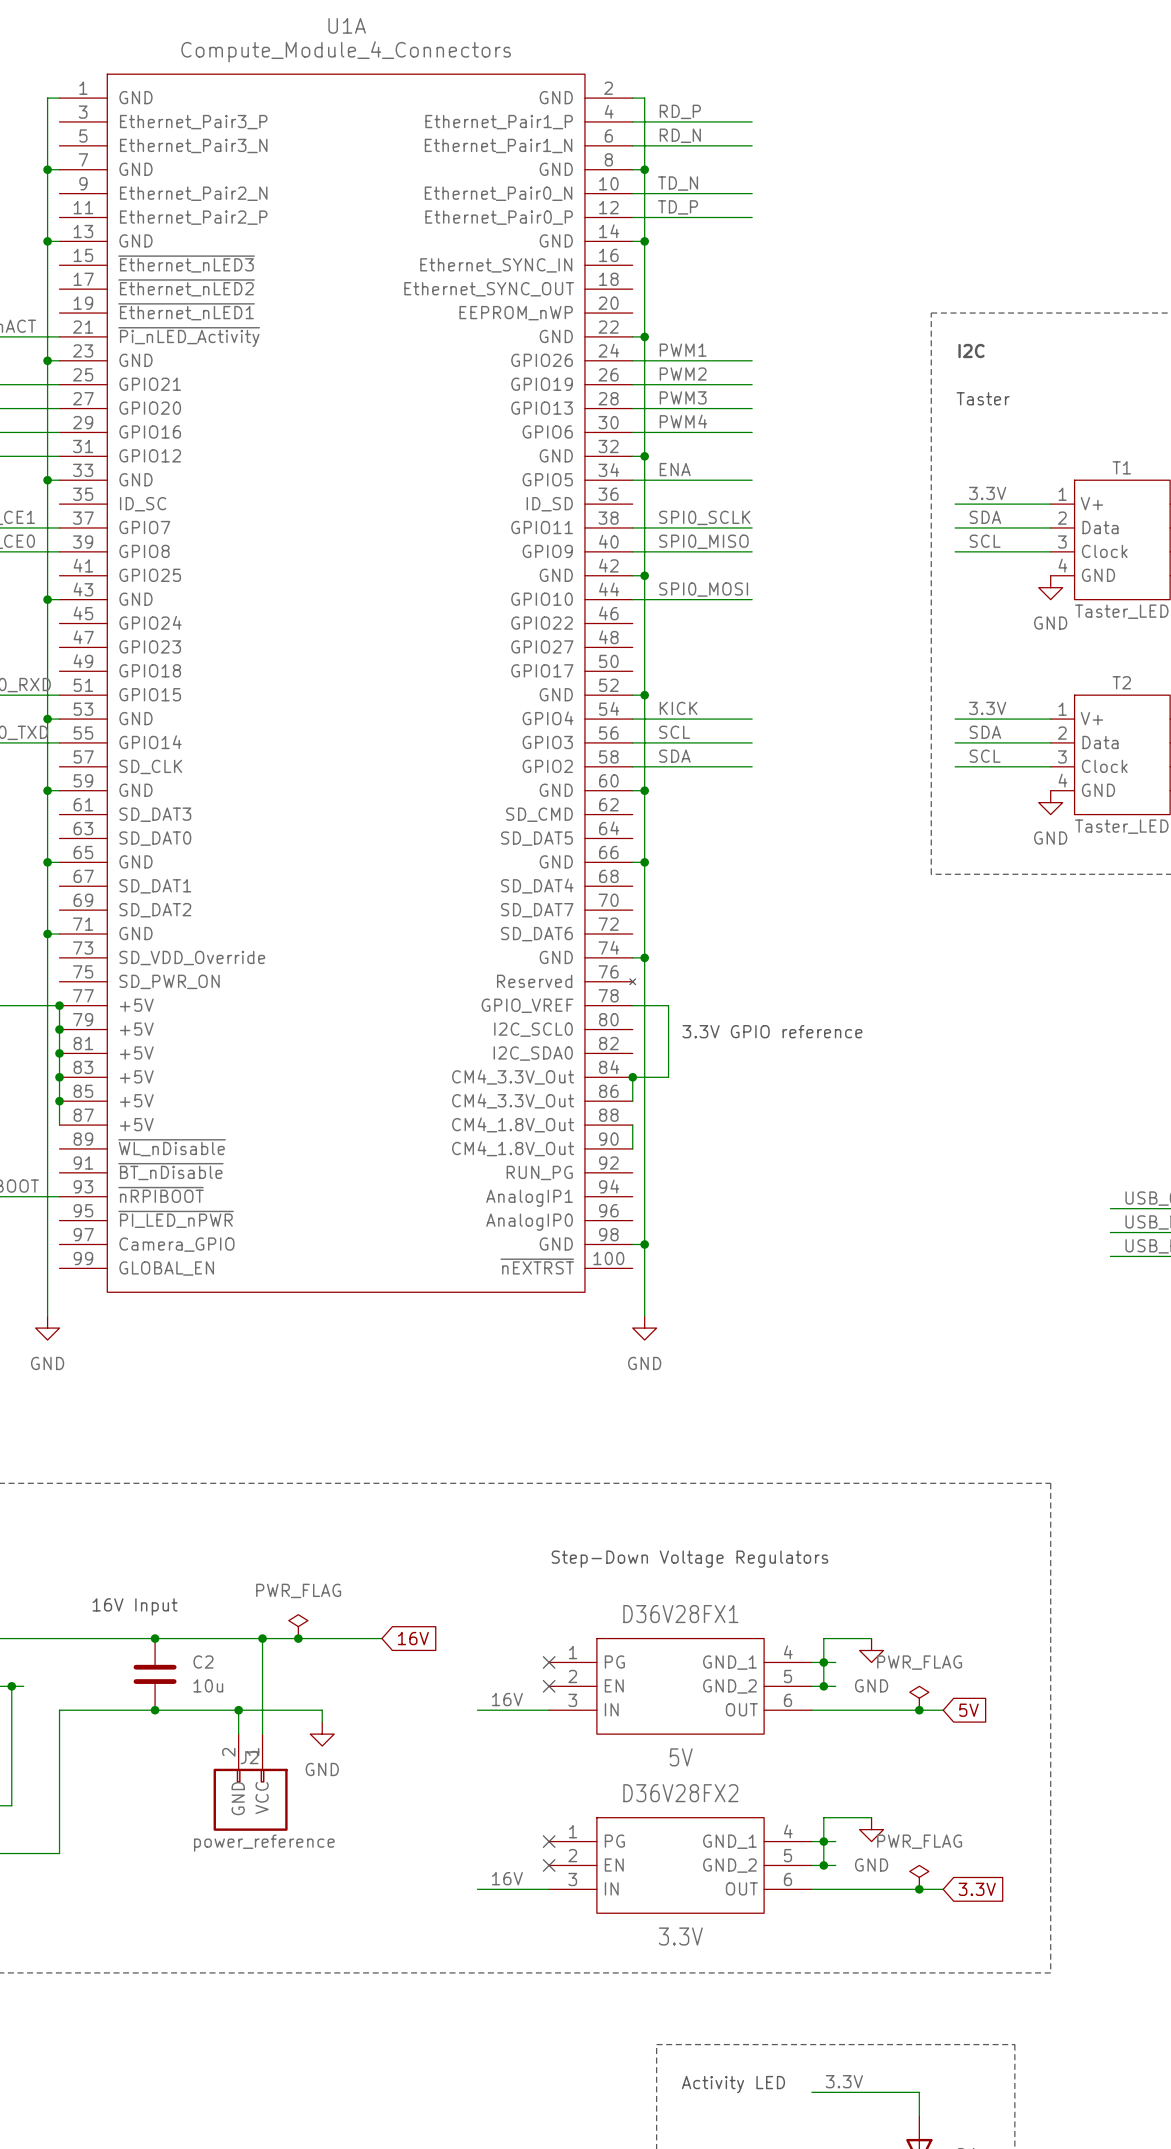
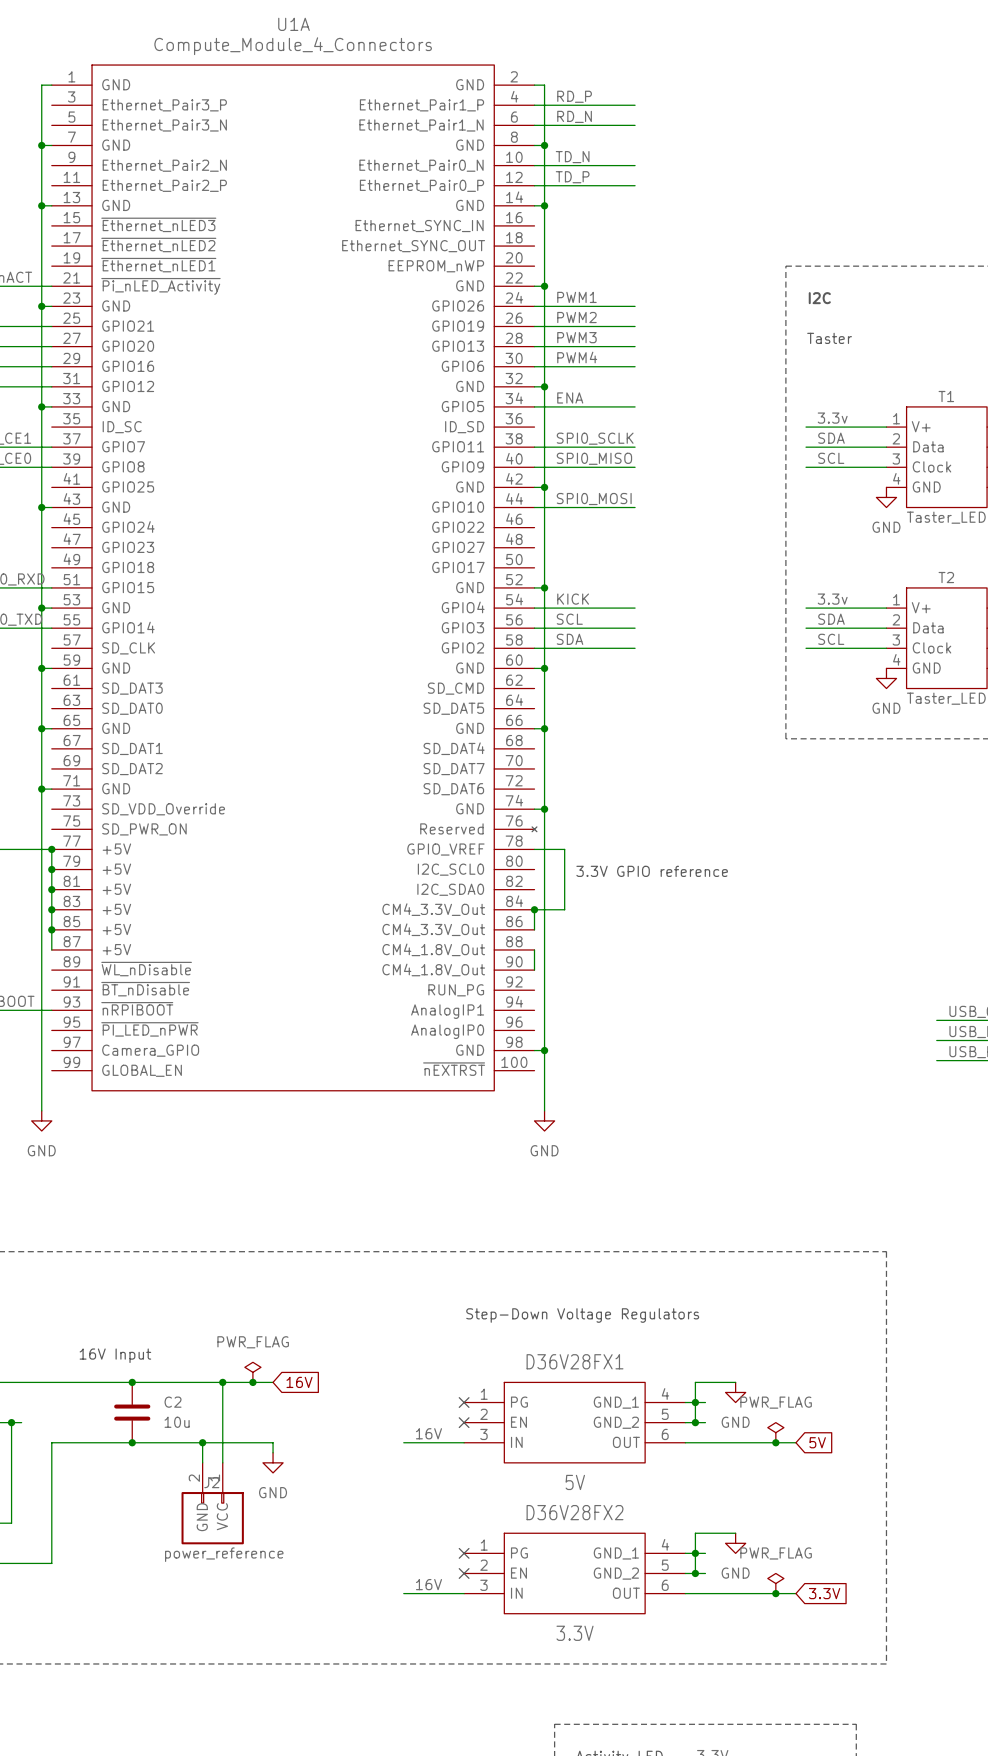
label: 3.3V (987, 493) -> 3.3v (832, 418)
label: 3.3V (987, 708) -> 3.3v (832, 599)
wire: (322, 1638) (381, 1638) -> none
global label position: 16V (413, 1638) -> 16V (299, 1382)

